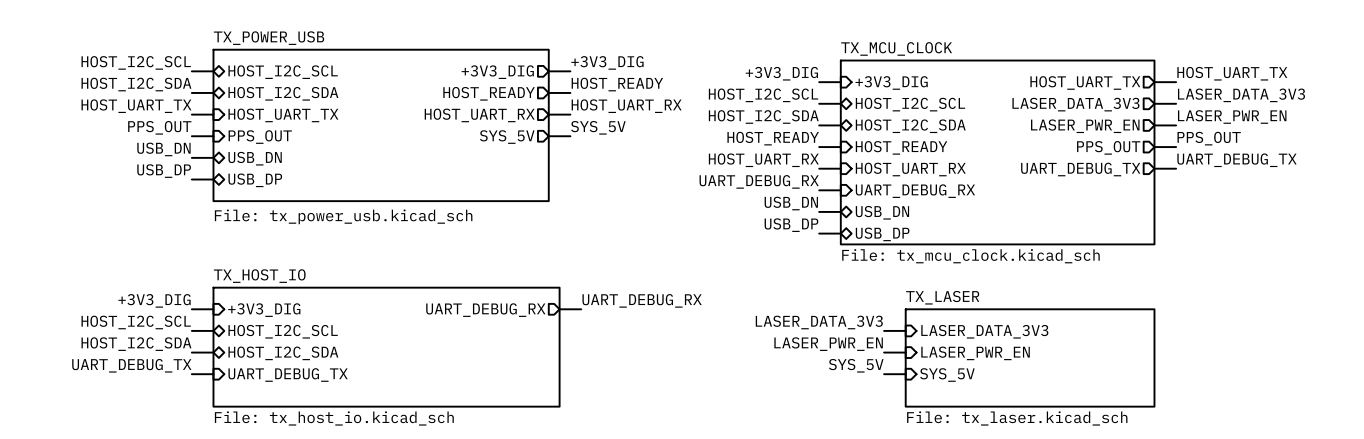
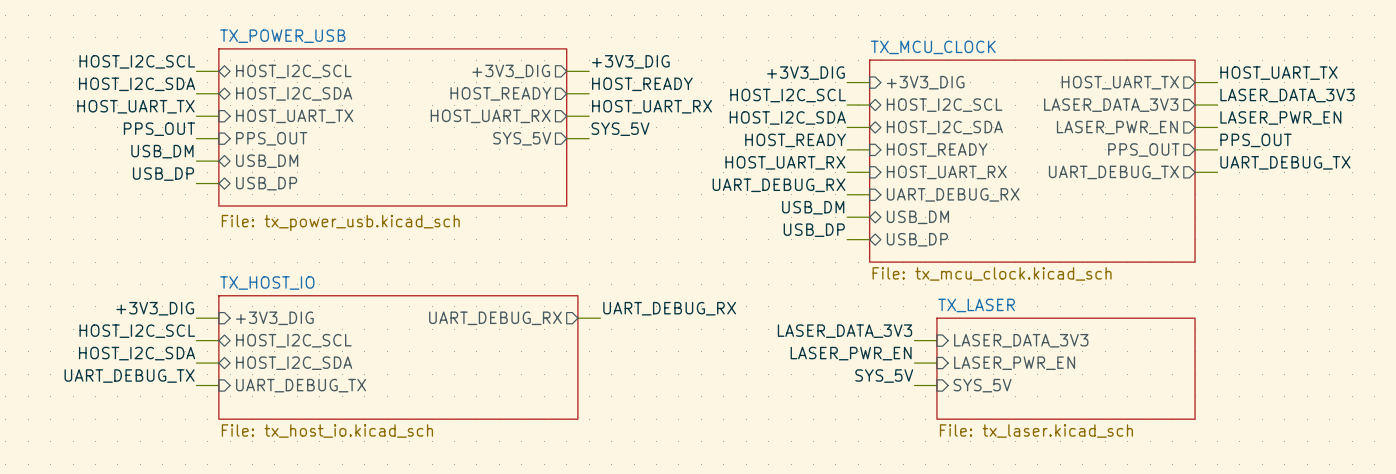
sheet TX_MCU_CLOCK shape: [840, 59, 1156, 246] -> [868, 59, 1196, 263]
label: USB_DN (163, 149) -> USB_DM (162, 151)
sheet pin: USB_DN (255, 158) -> USB_DM (267, 161)
label: USB_DN (791, 203) -> USB_DM (813, 207)
sheet pin: USB_DN (882, 212) -> USB_DM (917, 217)

